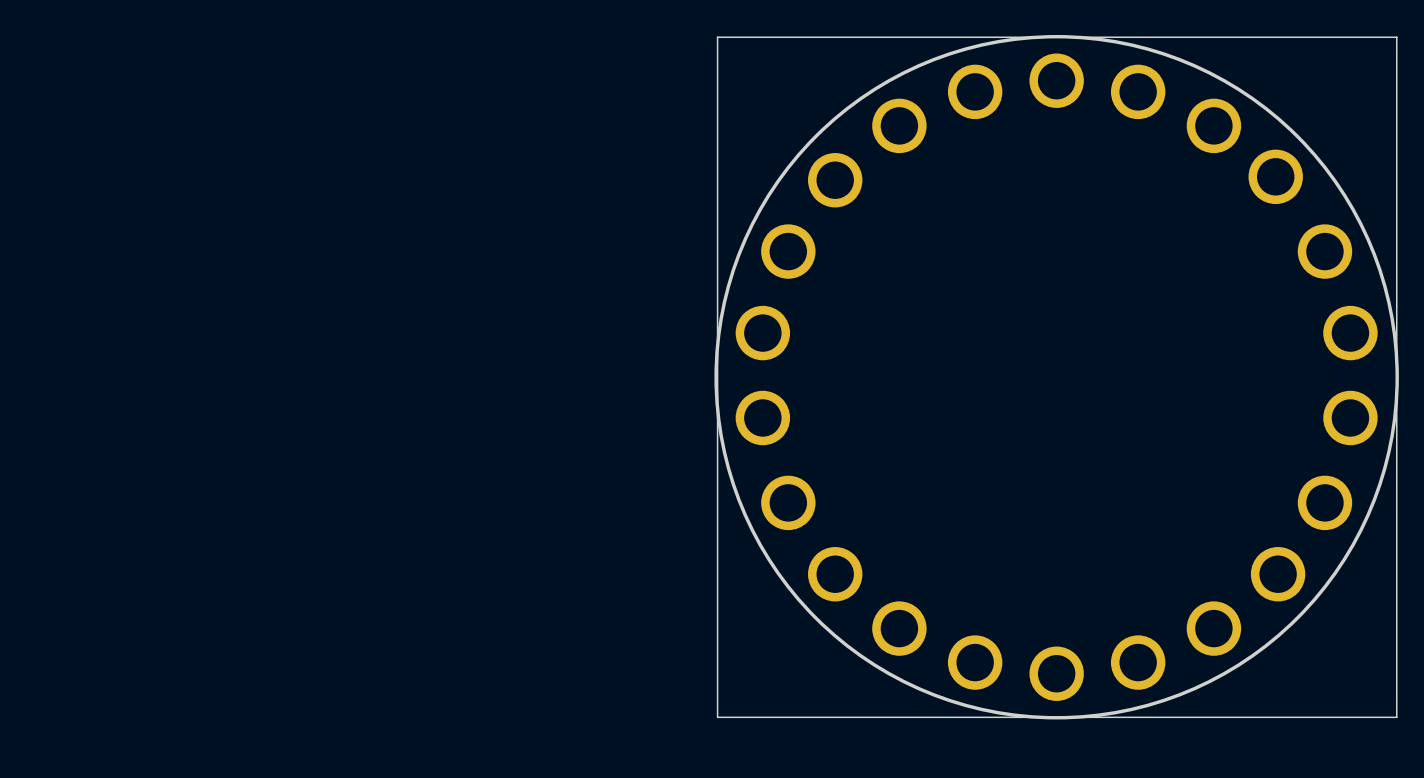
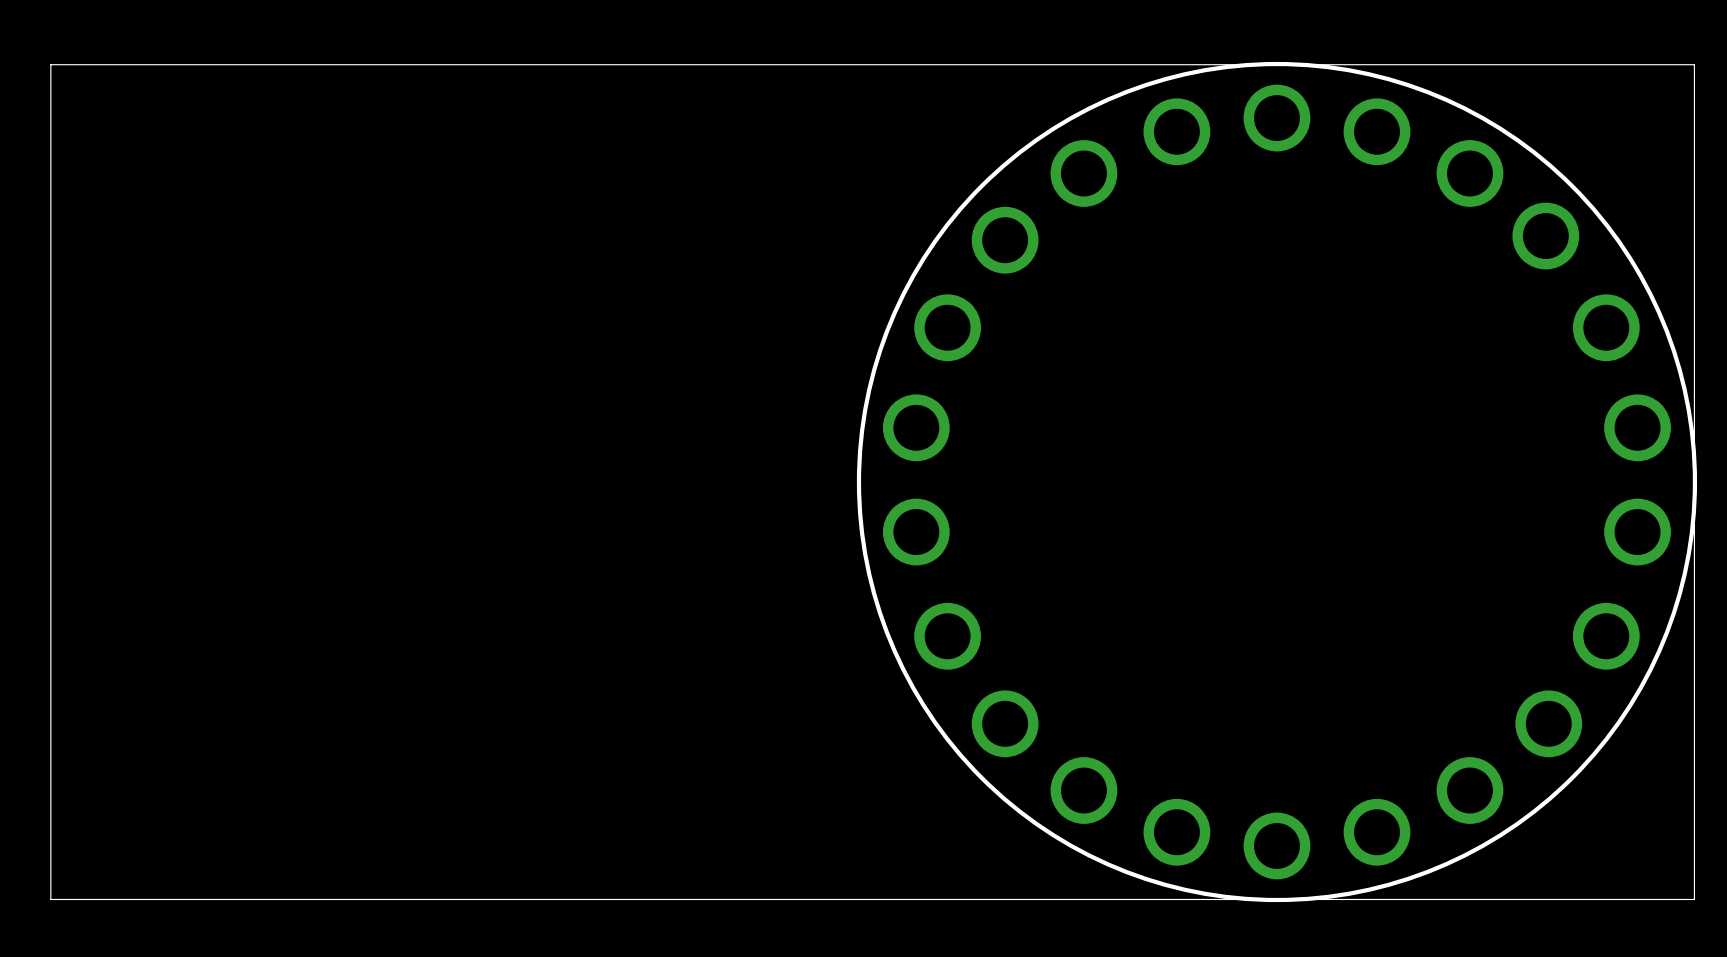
board edge: (717, 37) (717, 717) -> (860, 64) (50, 64) (50, 899) (860, 899)

